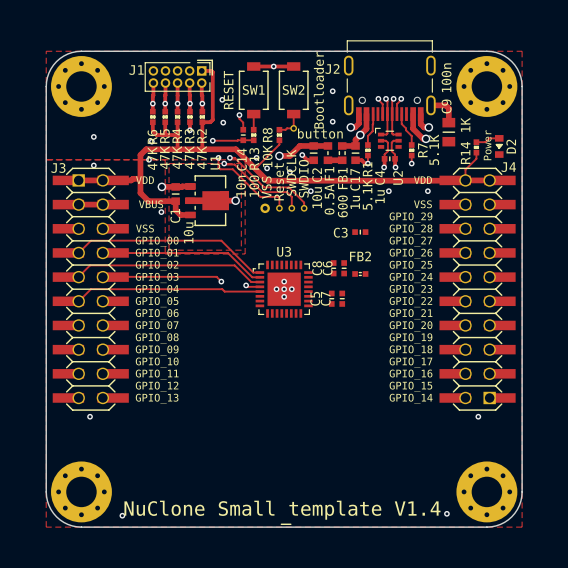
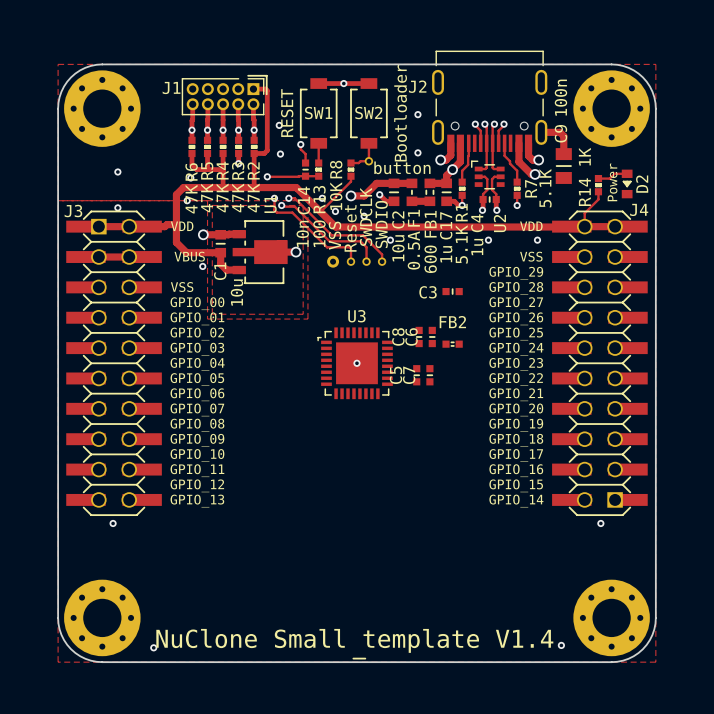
track: (78, 253) (90, 240) (221, 240) (253, 272) (259, 272) -> none
track: (112, 253) (228, 253) (252, 277) (259, 277) -> none
track: (103, 276) (216, 276) (221, 281) -> none
track: (69, 277) (77, 277) (90, 265) (234, 265) (251, 282) (259, 282) -> none
via: (221, 281) -> none
via: (284, 281) -> none
track: (246, 285) (259, 286) -> none
via: (246, 285) -> none
via: (276, 289) -> none
via: (291, 289) -> none
track: (259, 291) (224, 291) (222, 289) (90, 289) (78, 301) -> none
via: (284, 296) -> none

